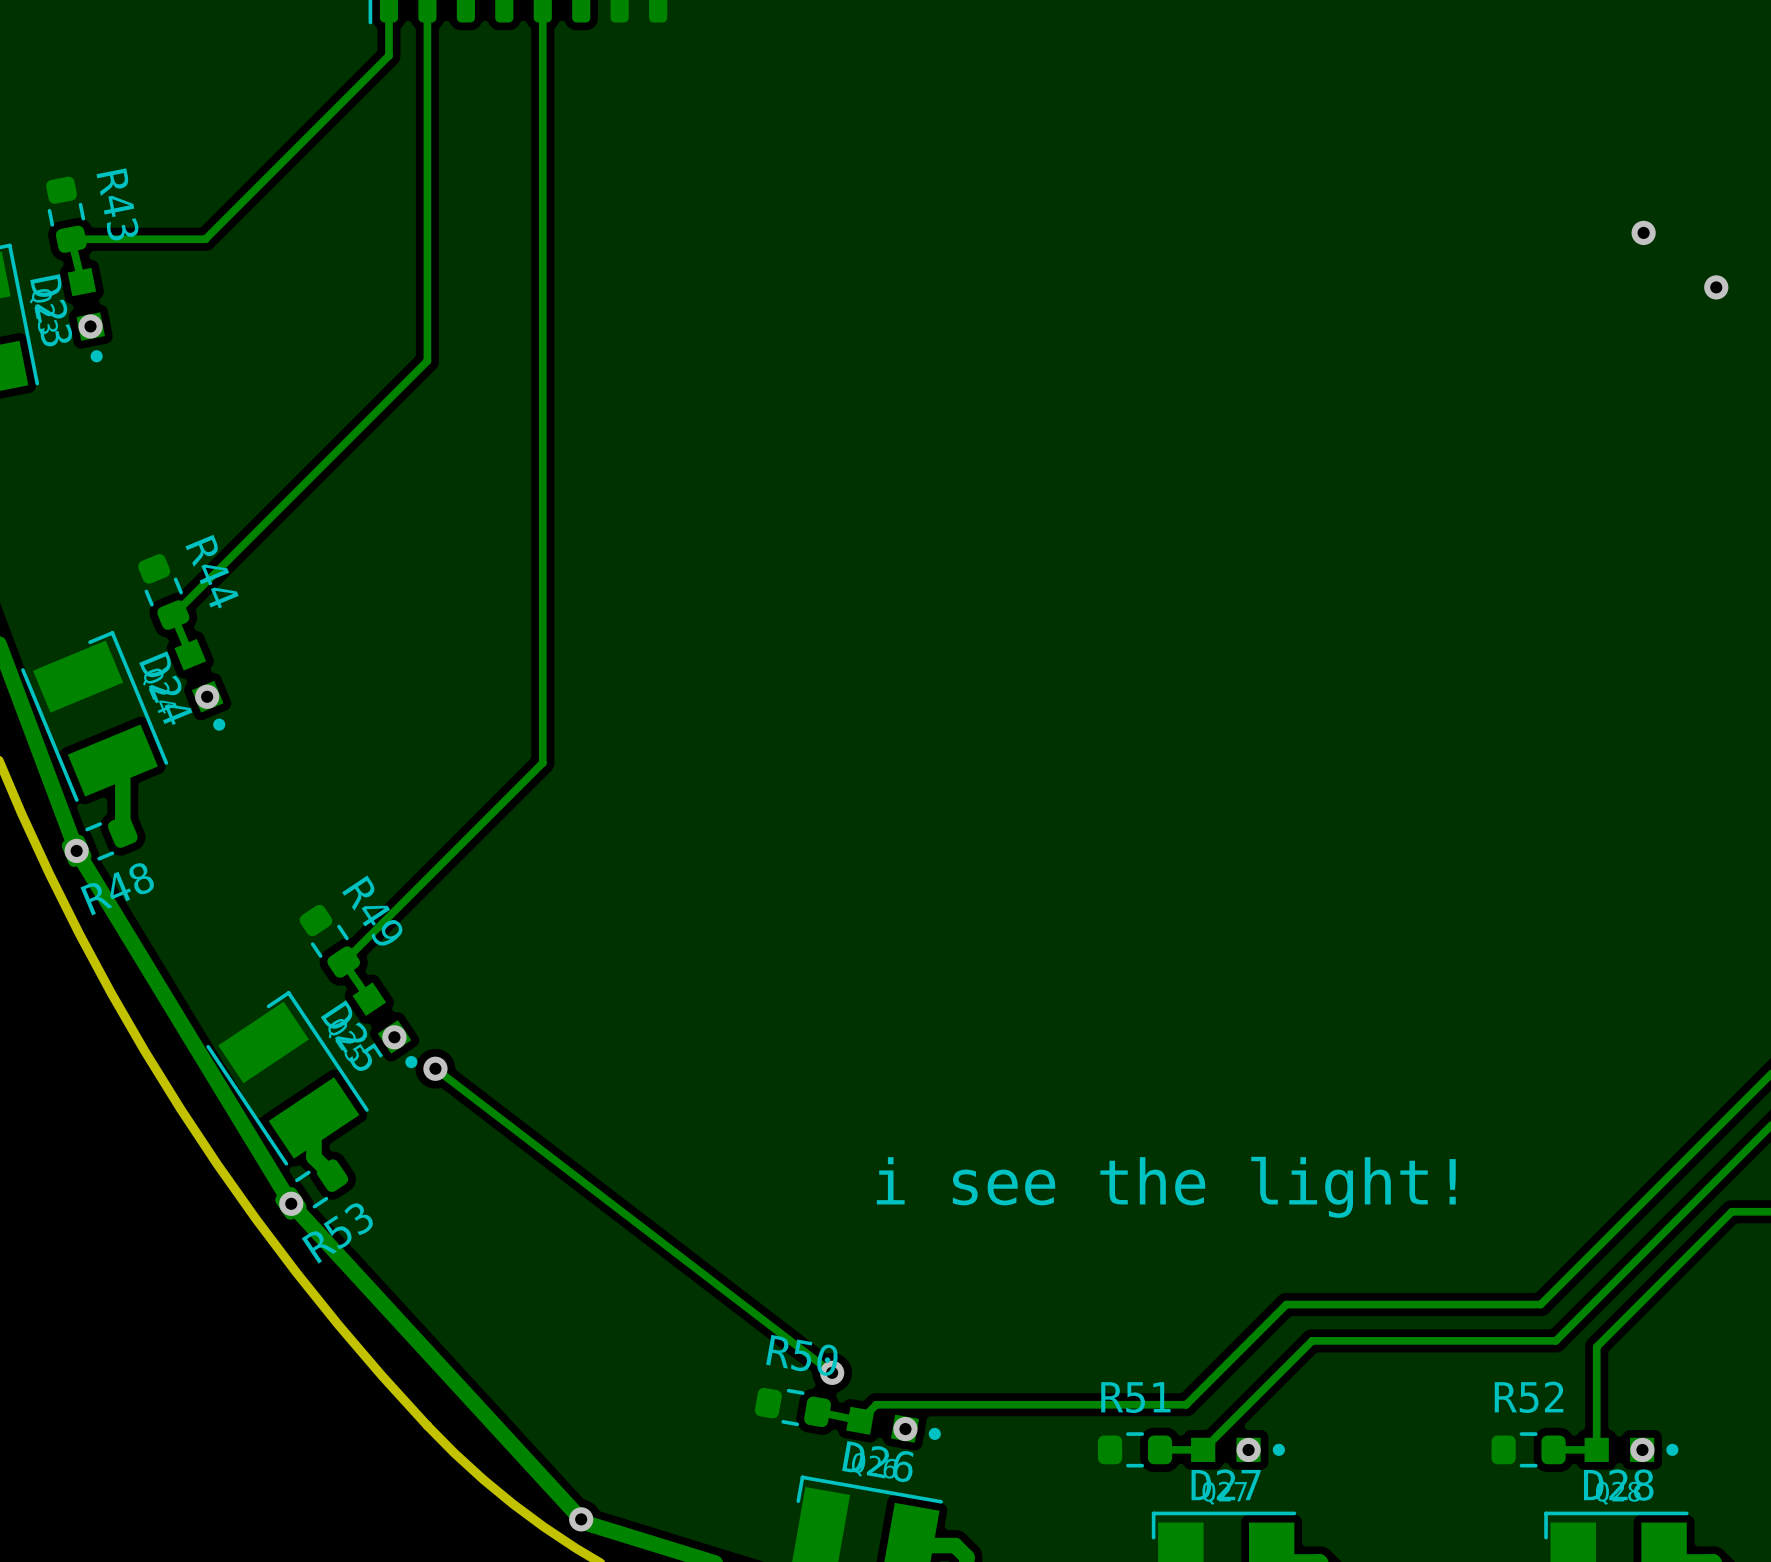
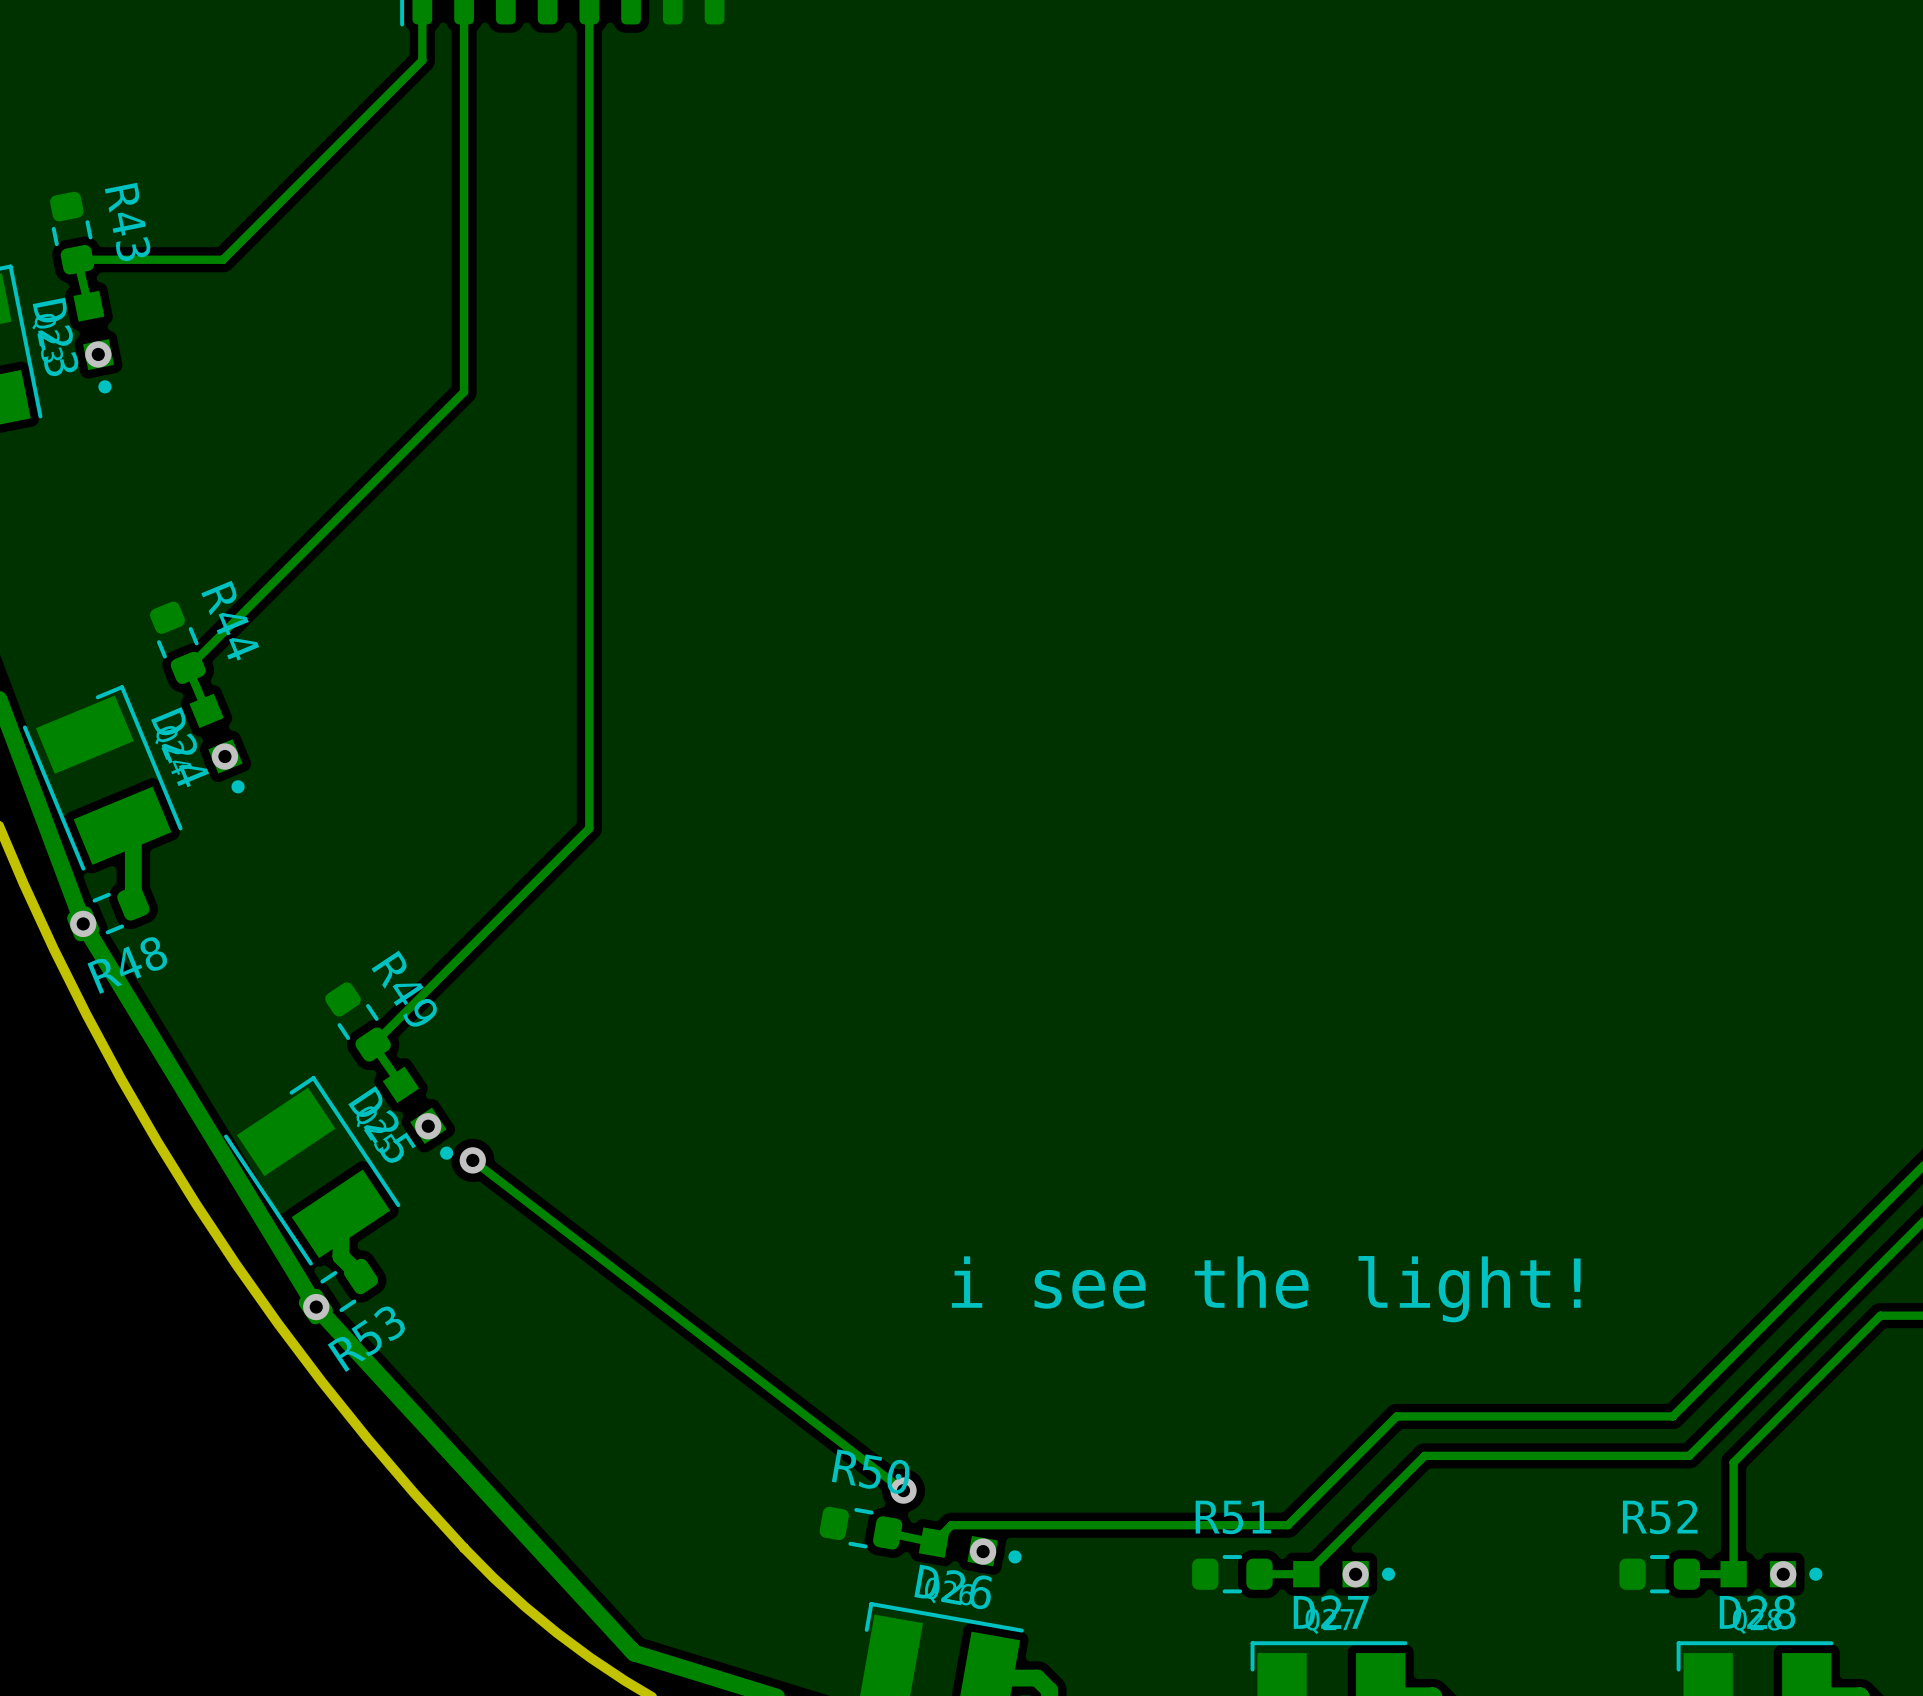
via: (1643, 232) -> none
via: (1716, 287) -> none
via: (581, 1519) -> none

